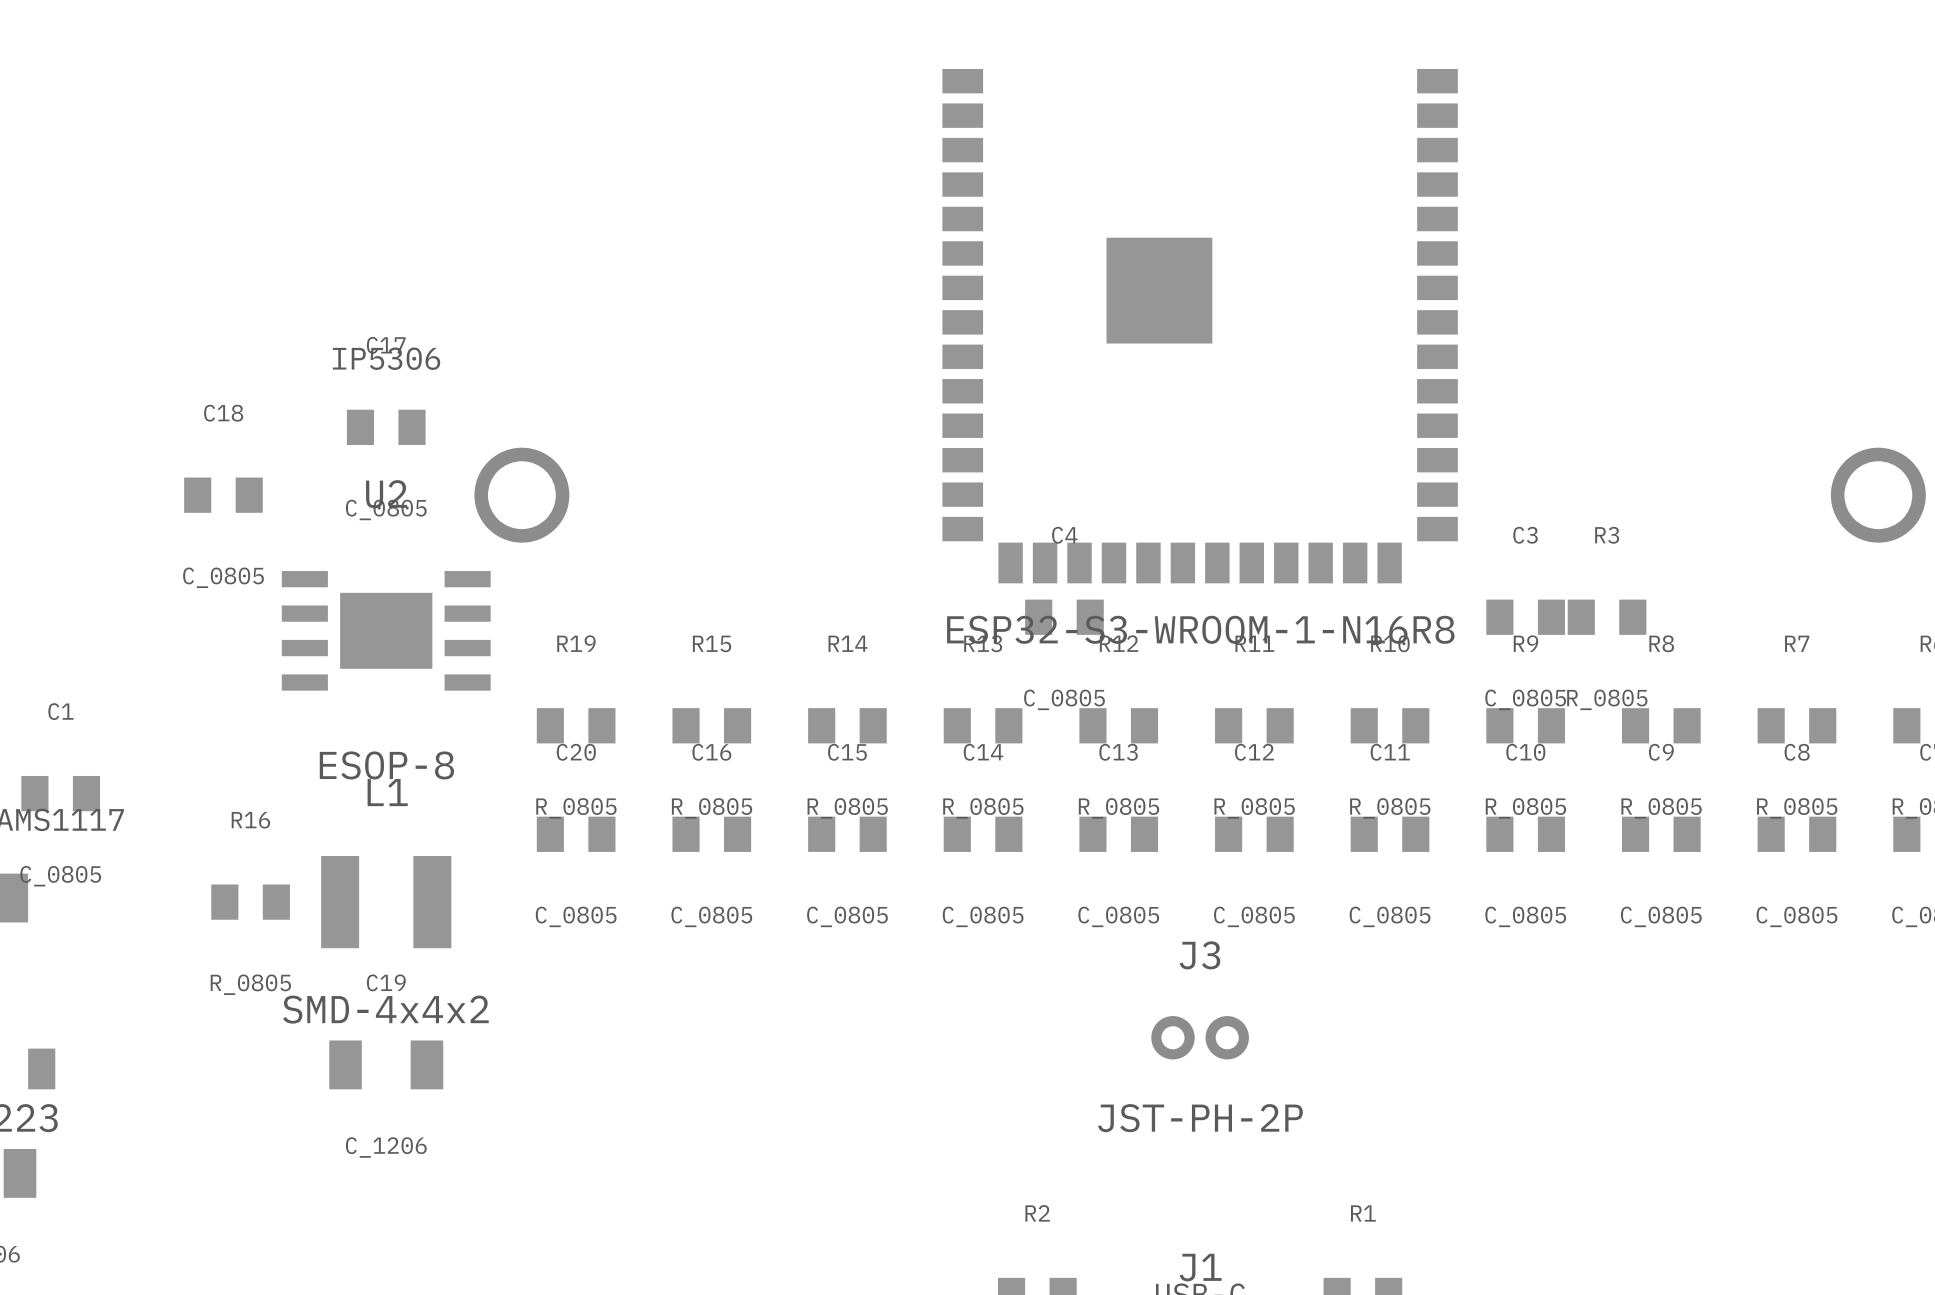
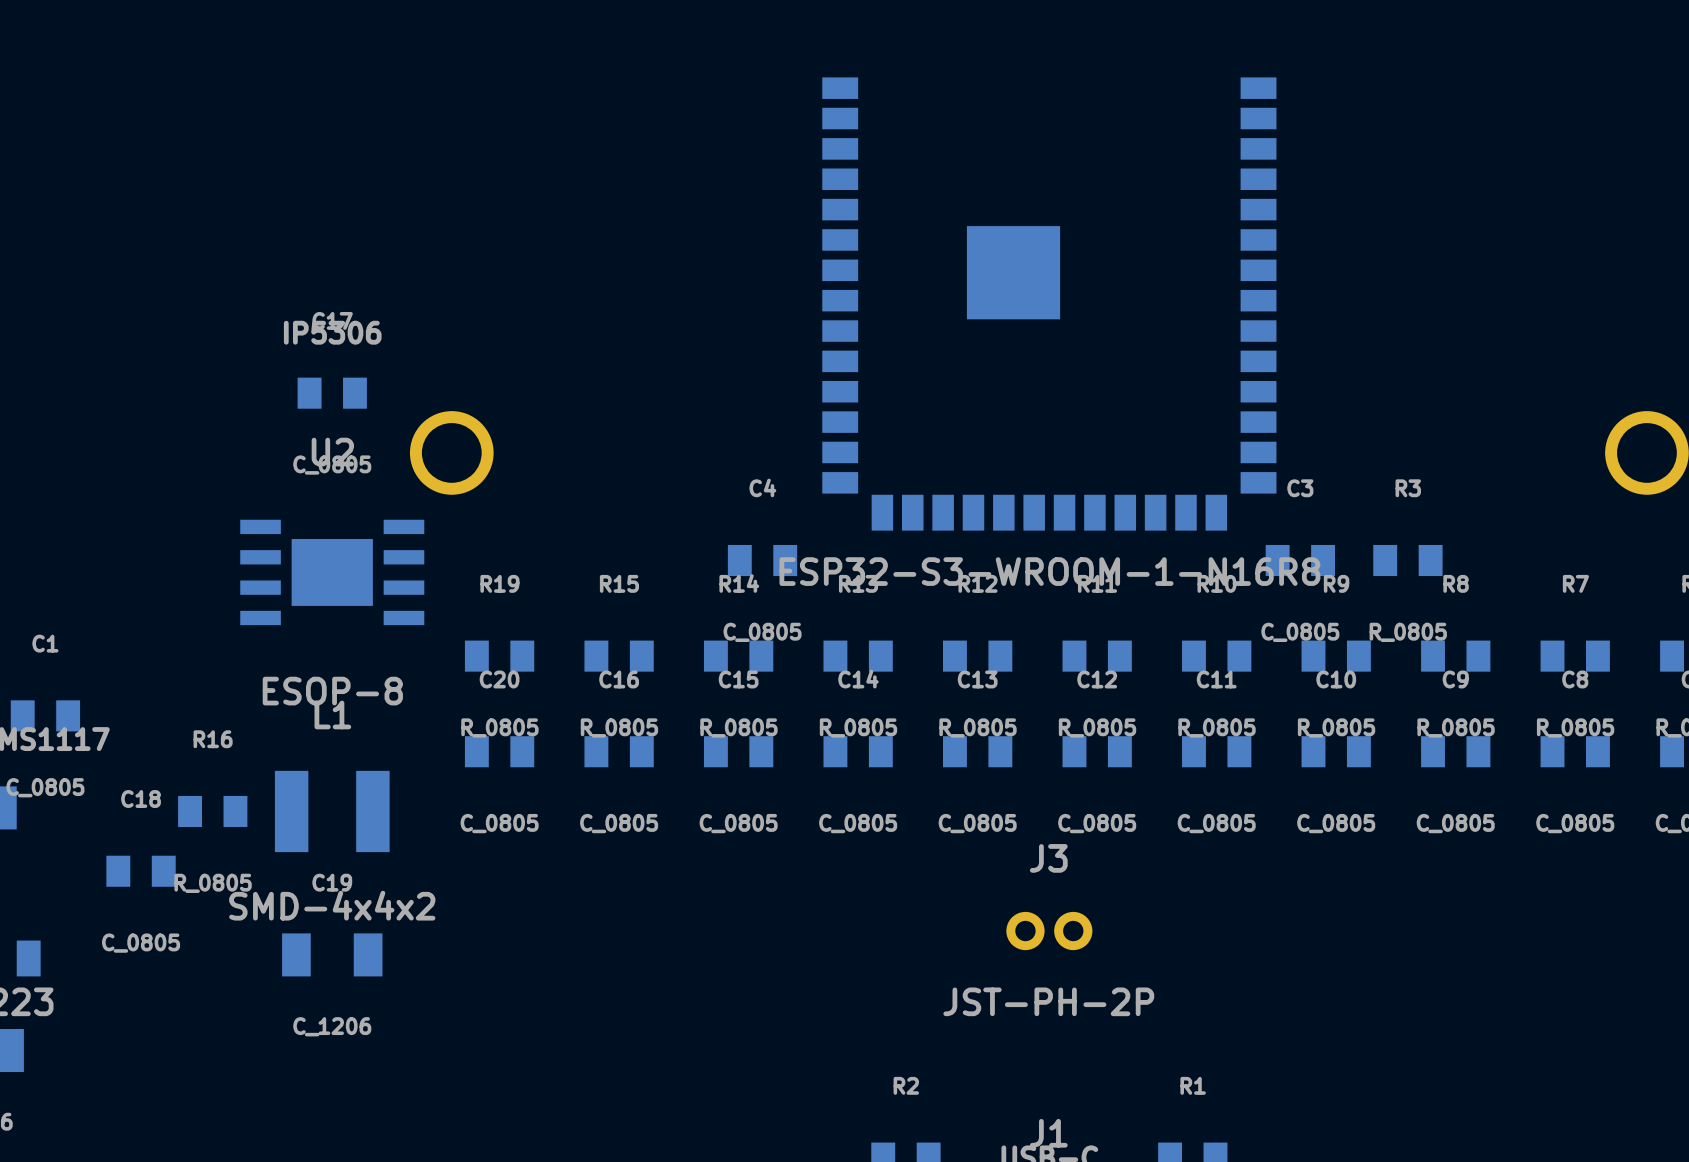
C18 position: (223, 495) -> (141, 871)
C4 position: (1064, 617) -> (762, 560)
C3 position: (1525, 617) -> (1300, 560)

